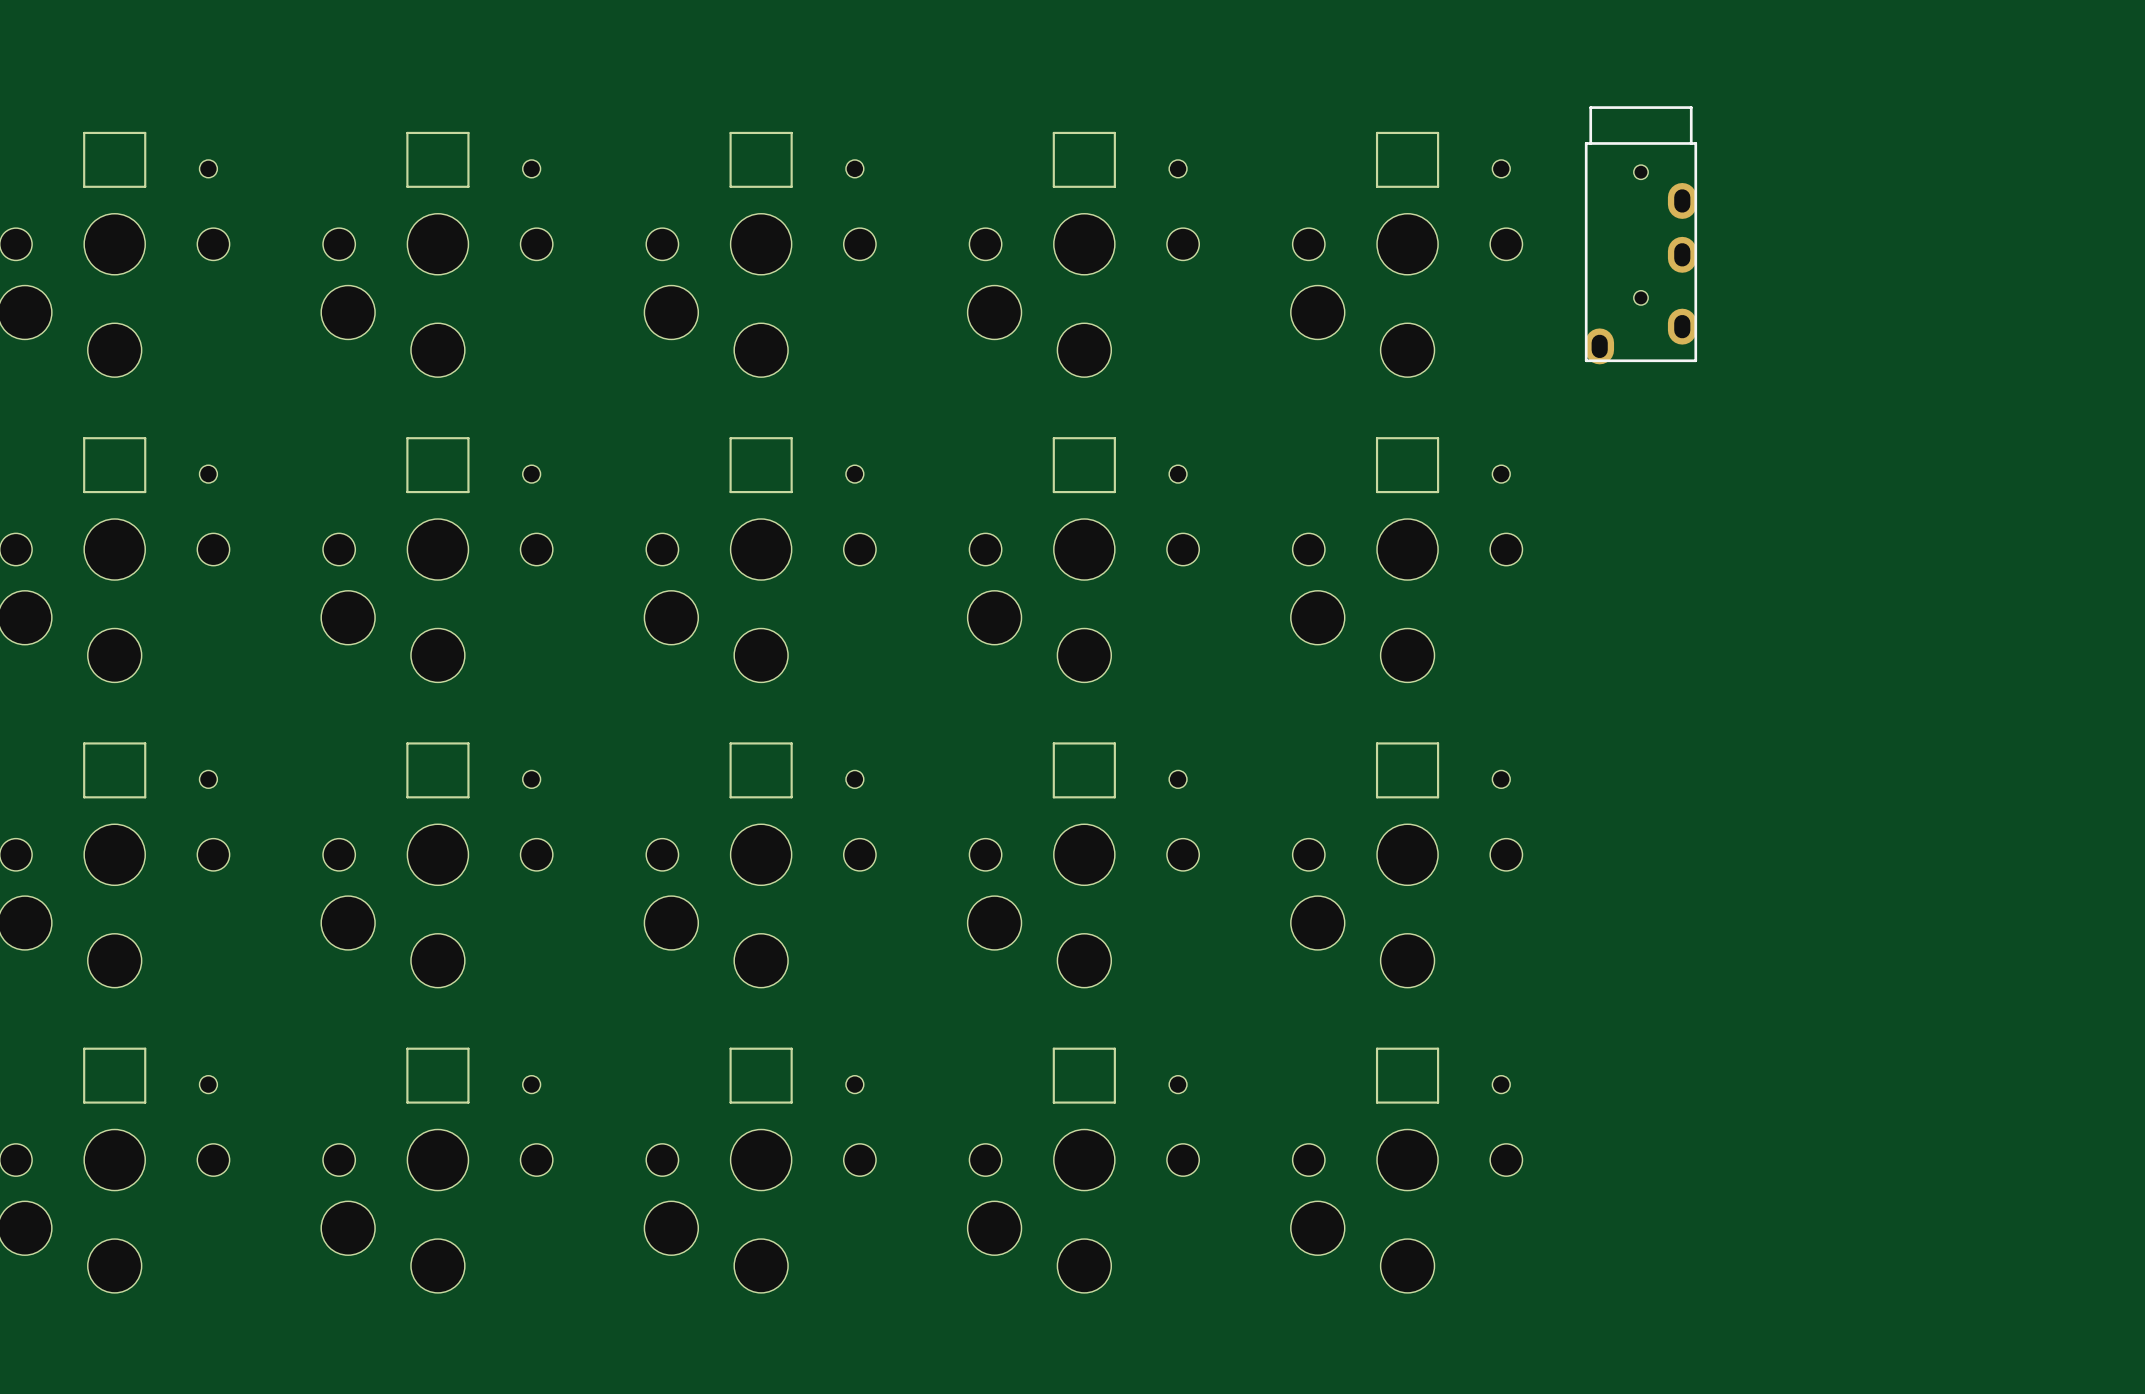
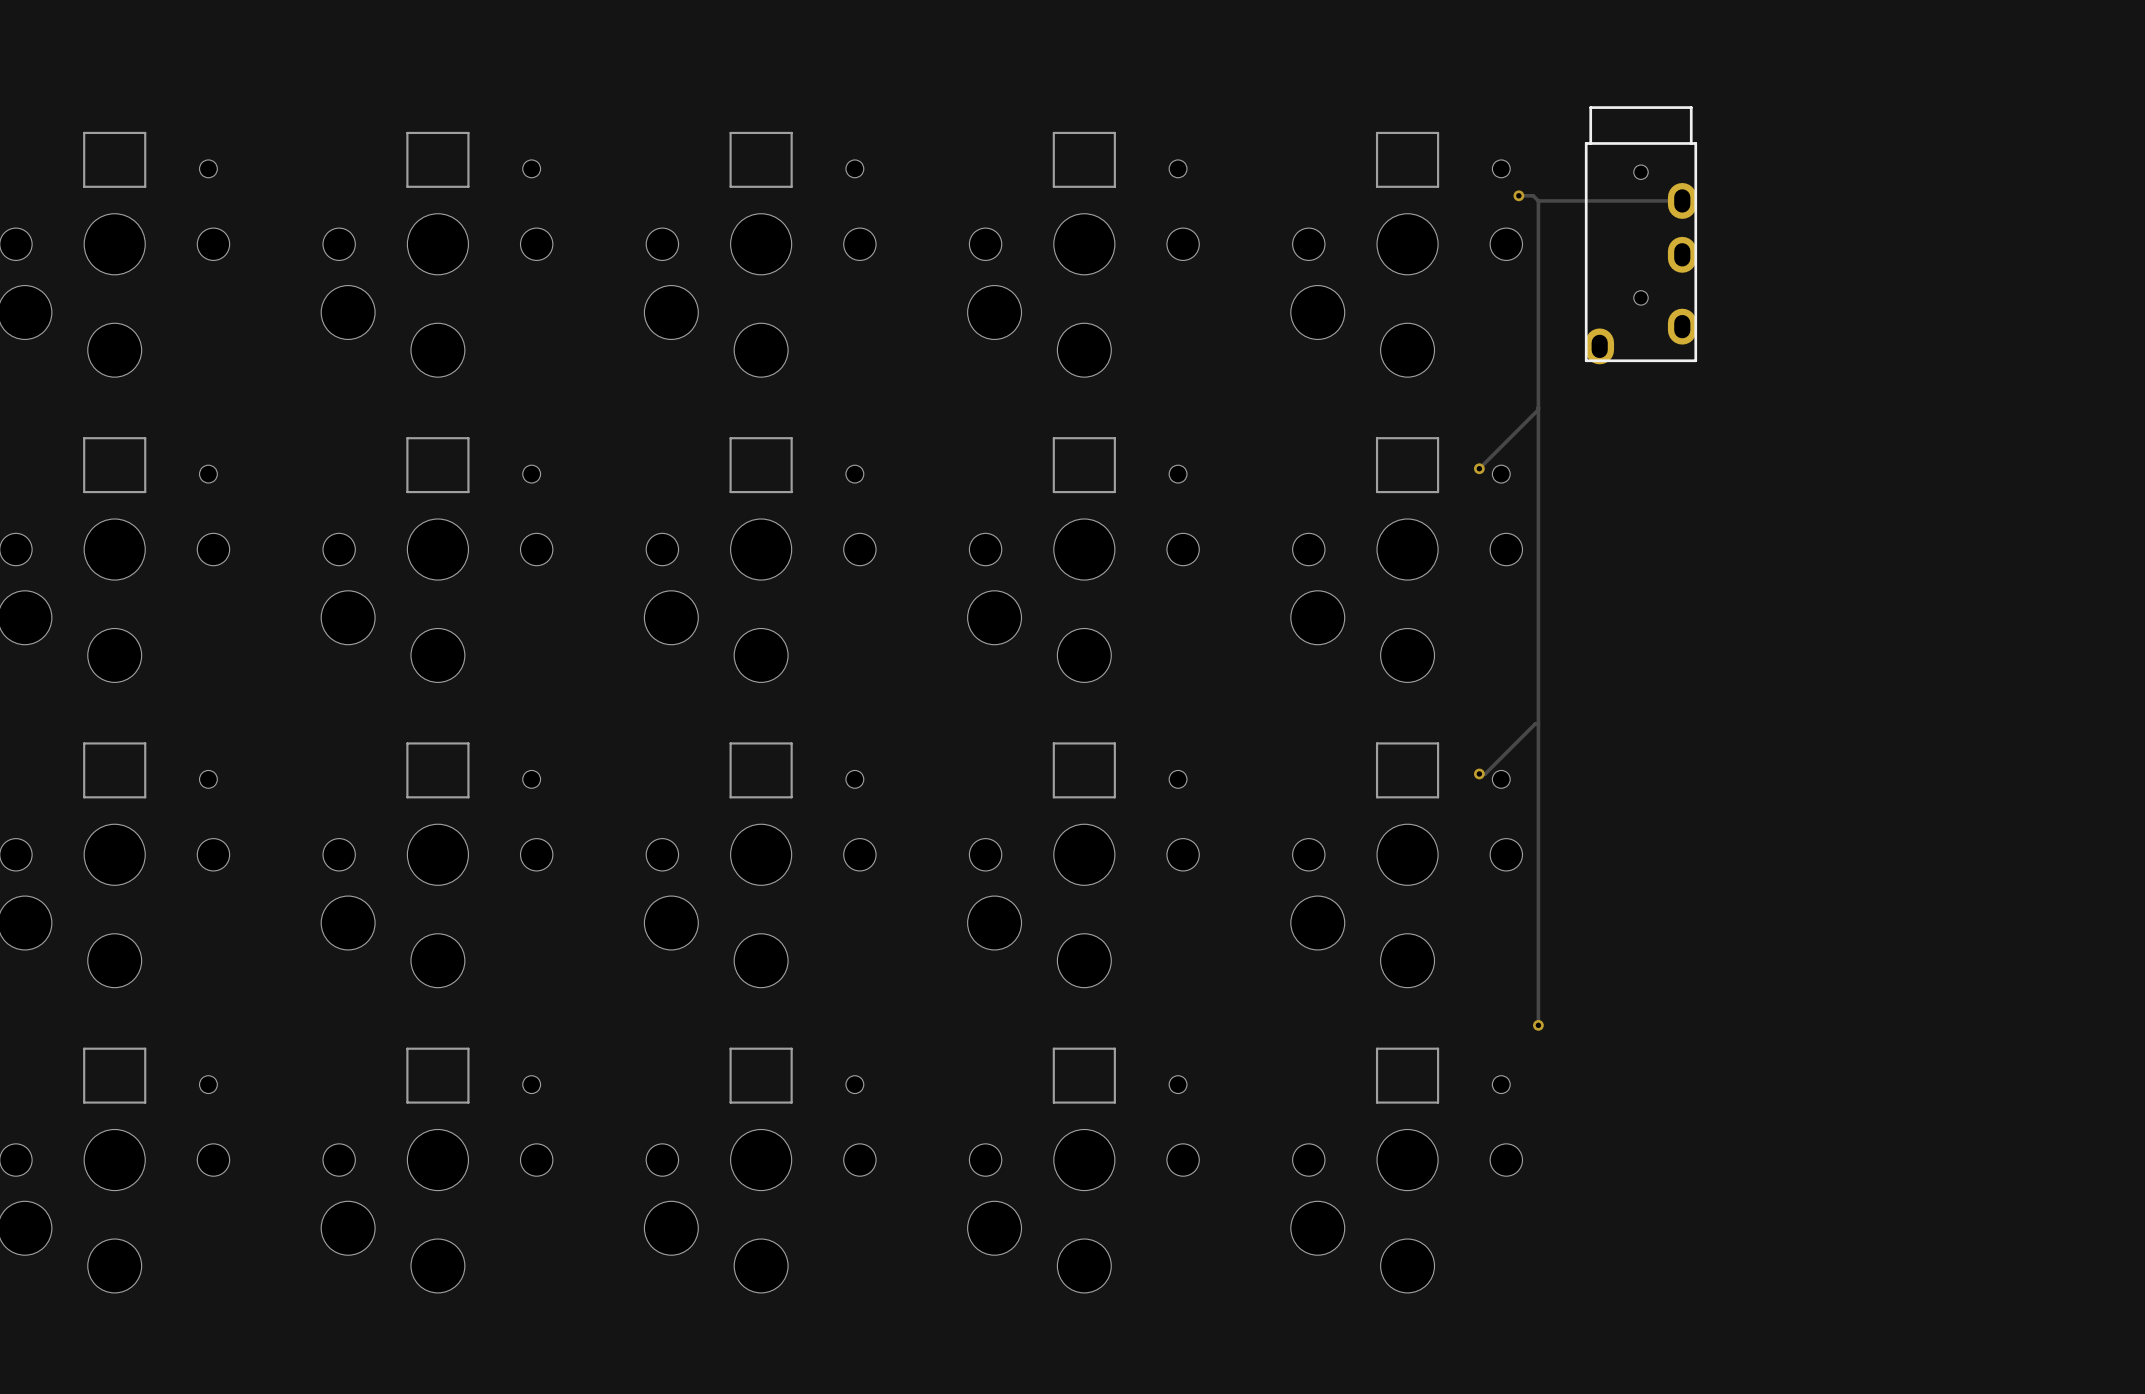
track: none -> (1518, 195) (1533, 195) (1538, 200)
via: none -> (1518, 195)
track: none -> (1538, 200) (1538, 1026)
track: none -> (1538, 200) (1682, 200)
track: none -> (1538, 409) (1479, 468)
via: none -> (1479, 468)
track: none -> (1538, 723) (1535, 723) (1485, 773) (1479, 773)
via: none -> (1479, 773)
via: none -> (1538, 1025)

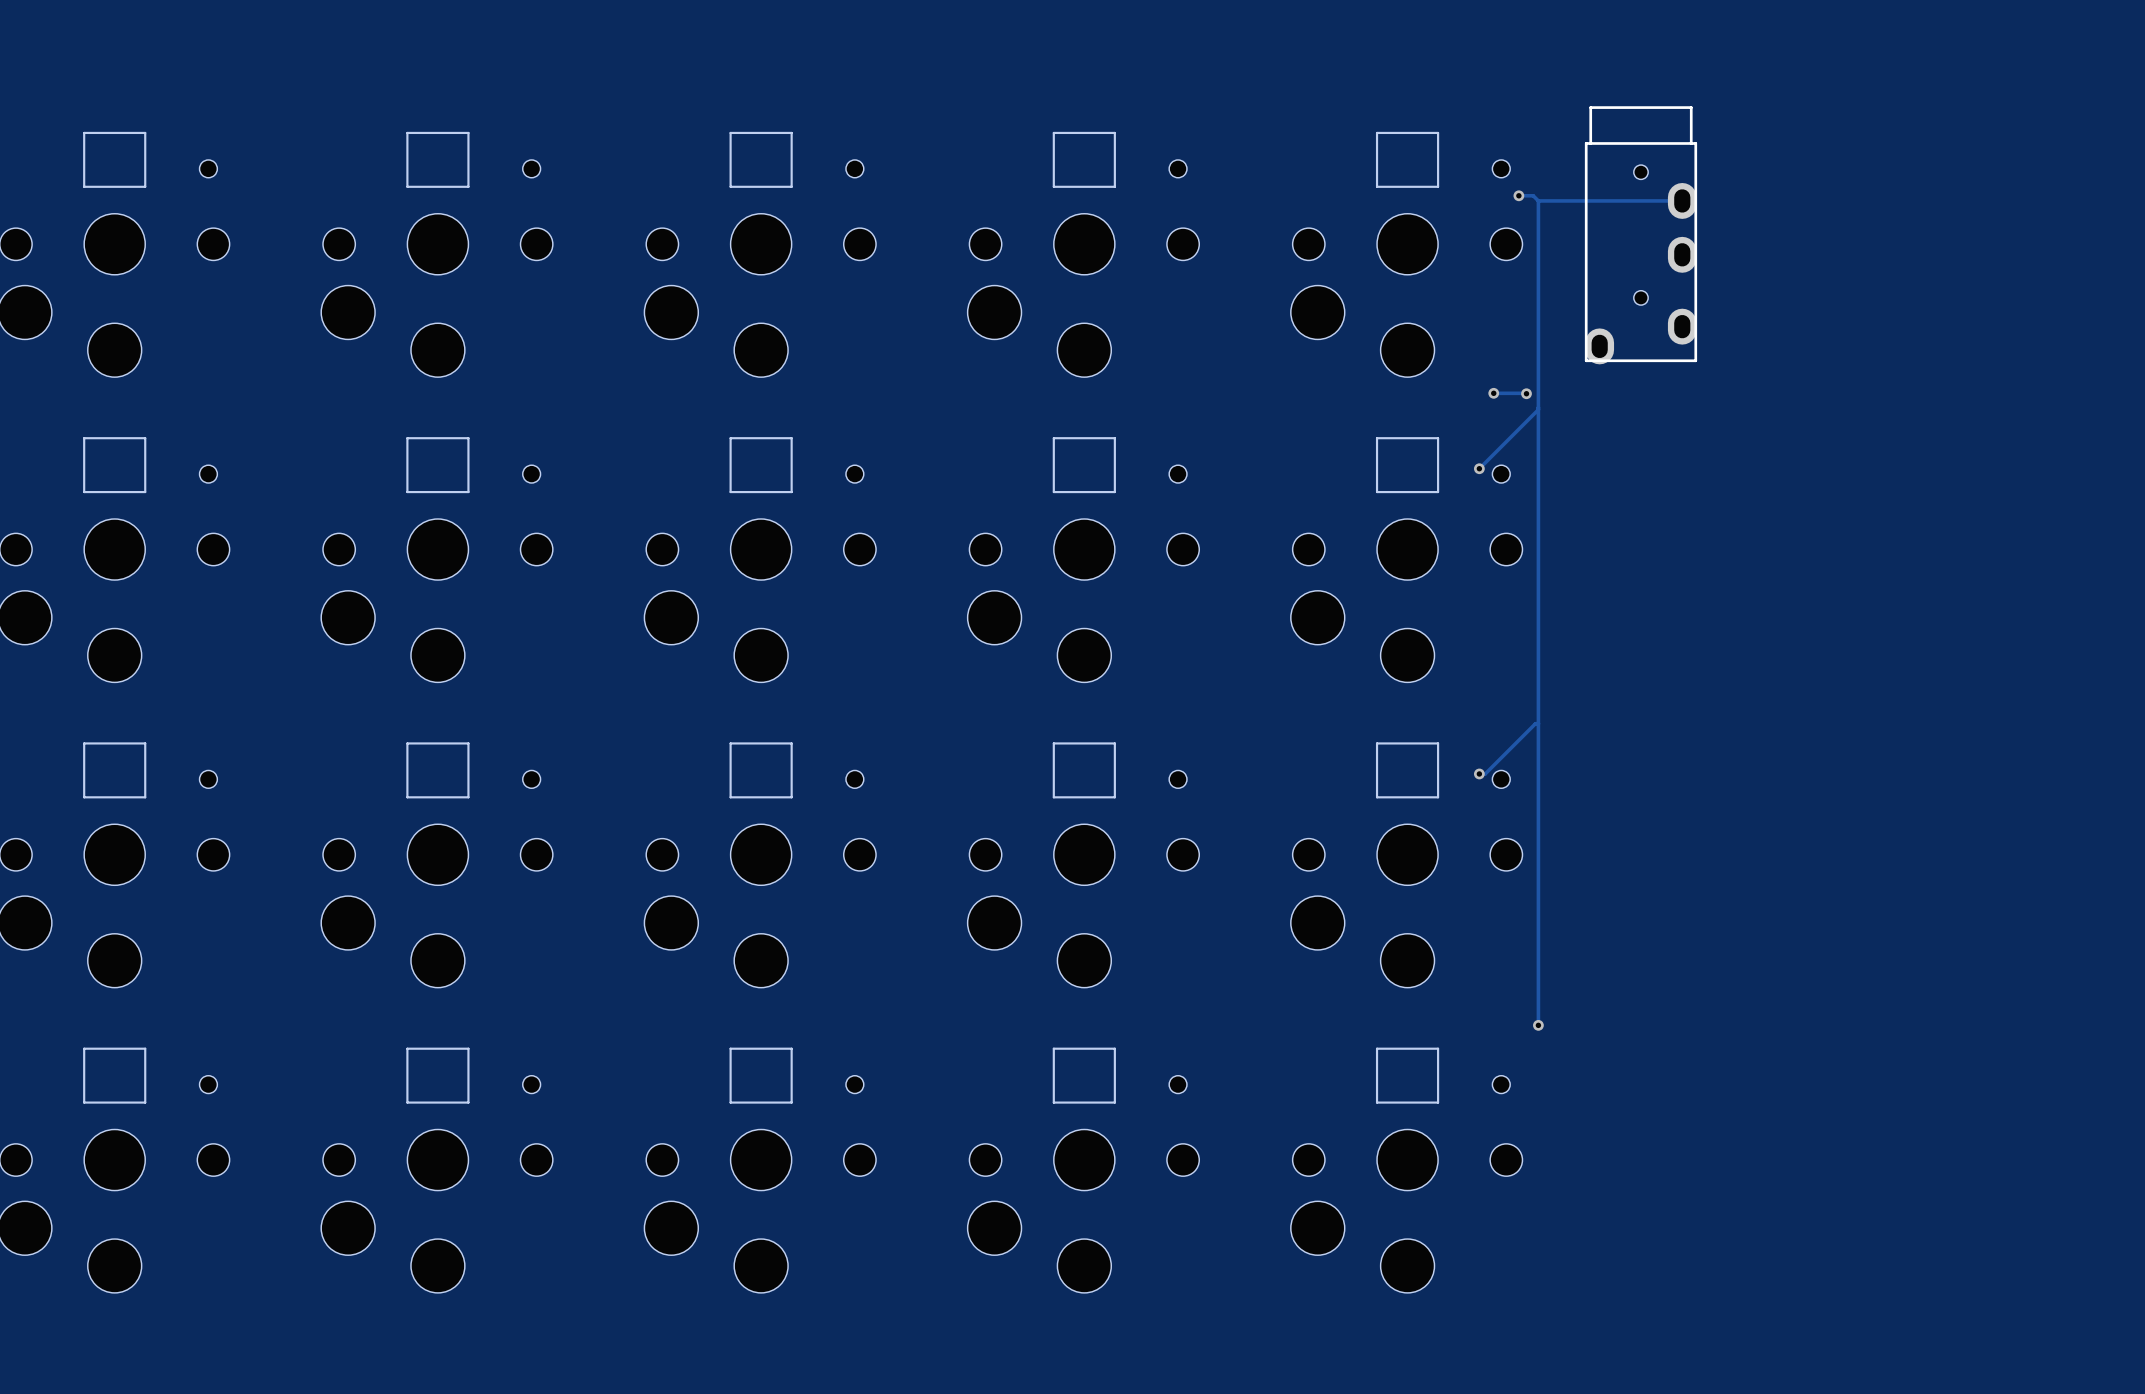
track: none -> (1493, 393) (1526, 393)
via: none -> (1493, 393)
via: none -> (1526, 393)

